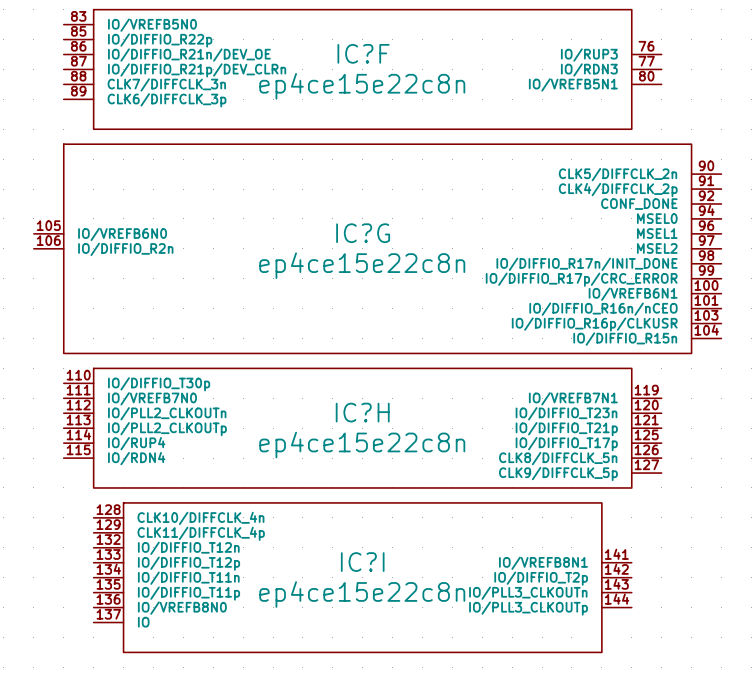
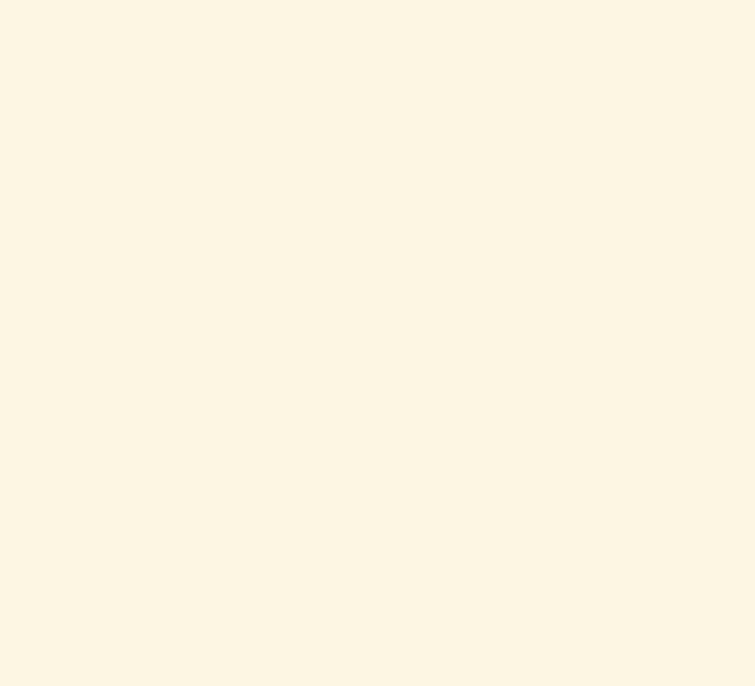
IC?F: ep4ce15e22c8n (362, 69) -> none
IC?G: ep4ce15e22c8n (377, 248) -> none
IC?H: ep4ce15e22c8n (362, 428) -> none
IC?I: ep4ce15e22c8n (362, 577) -> none

